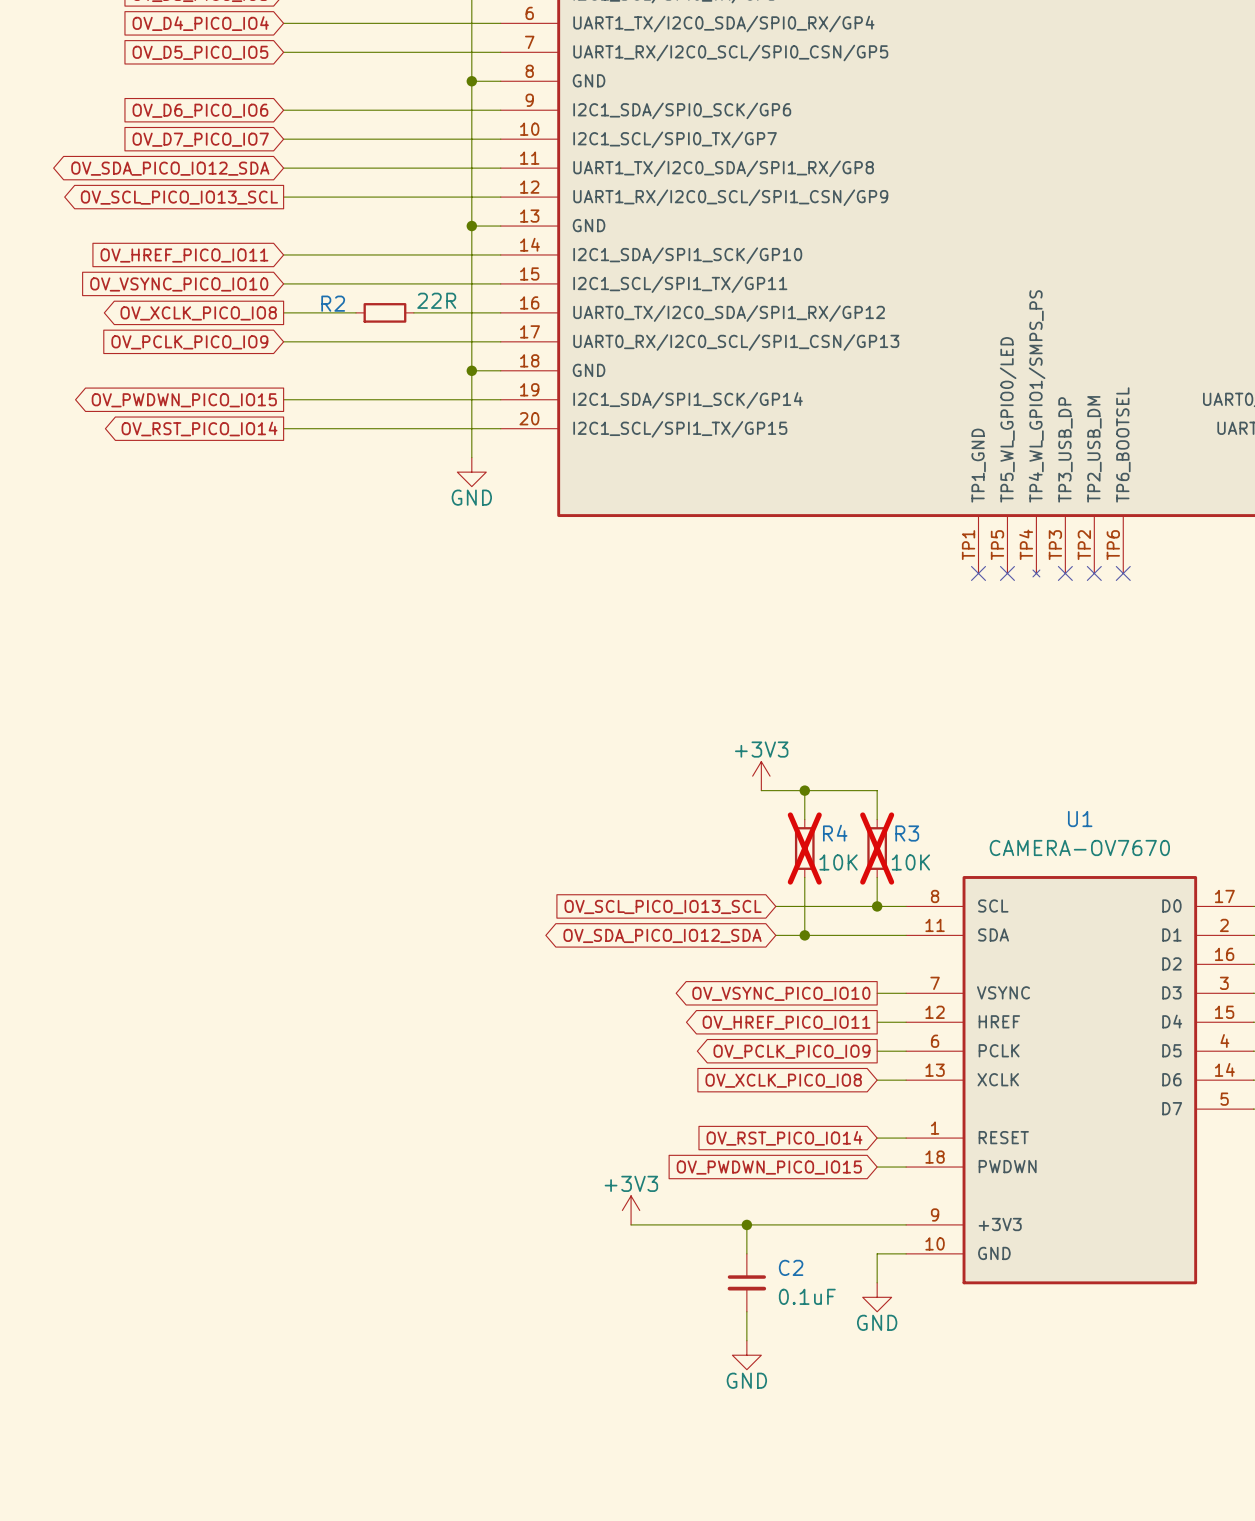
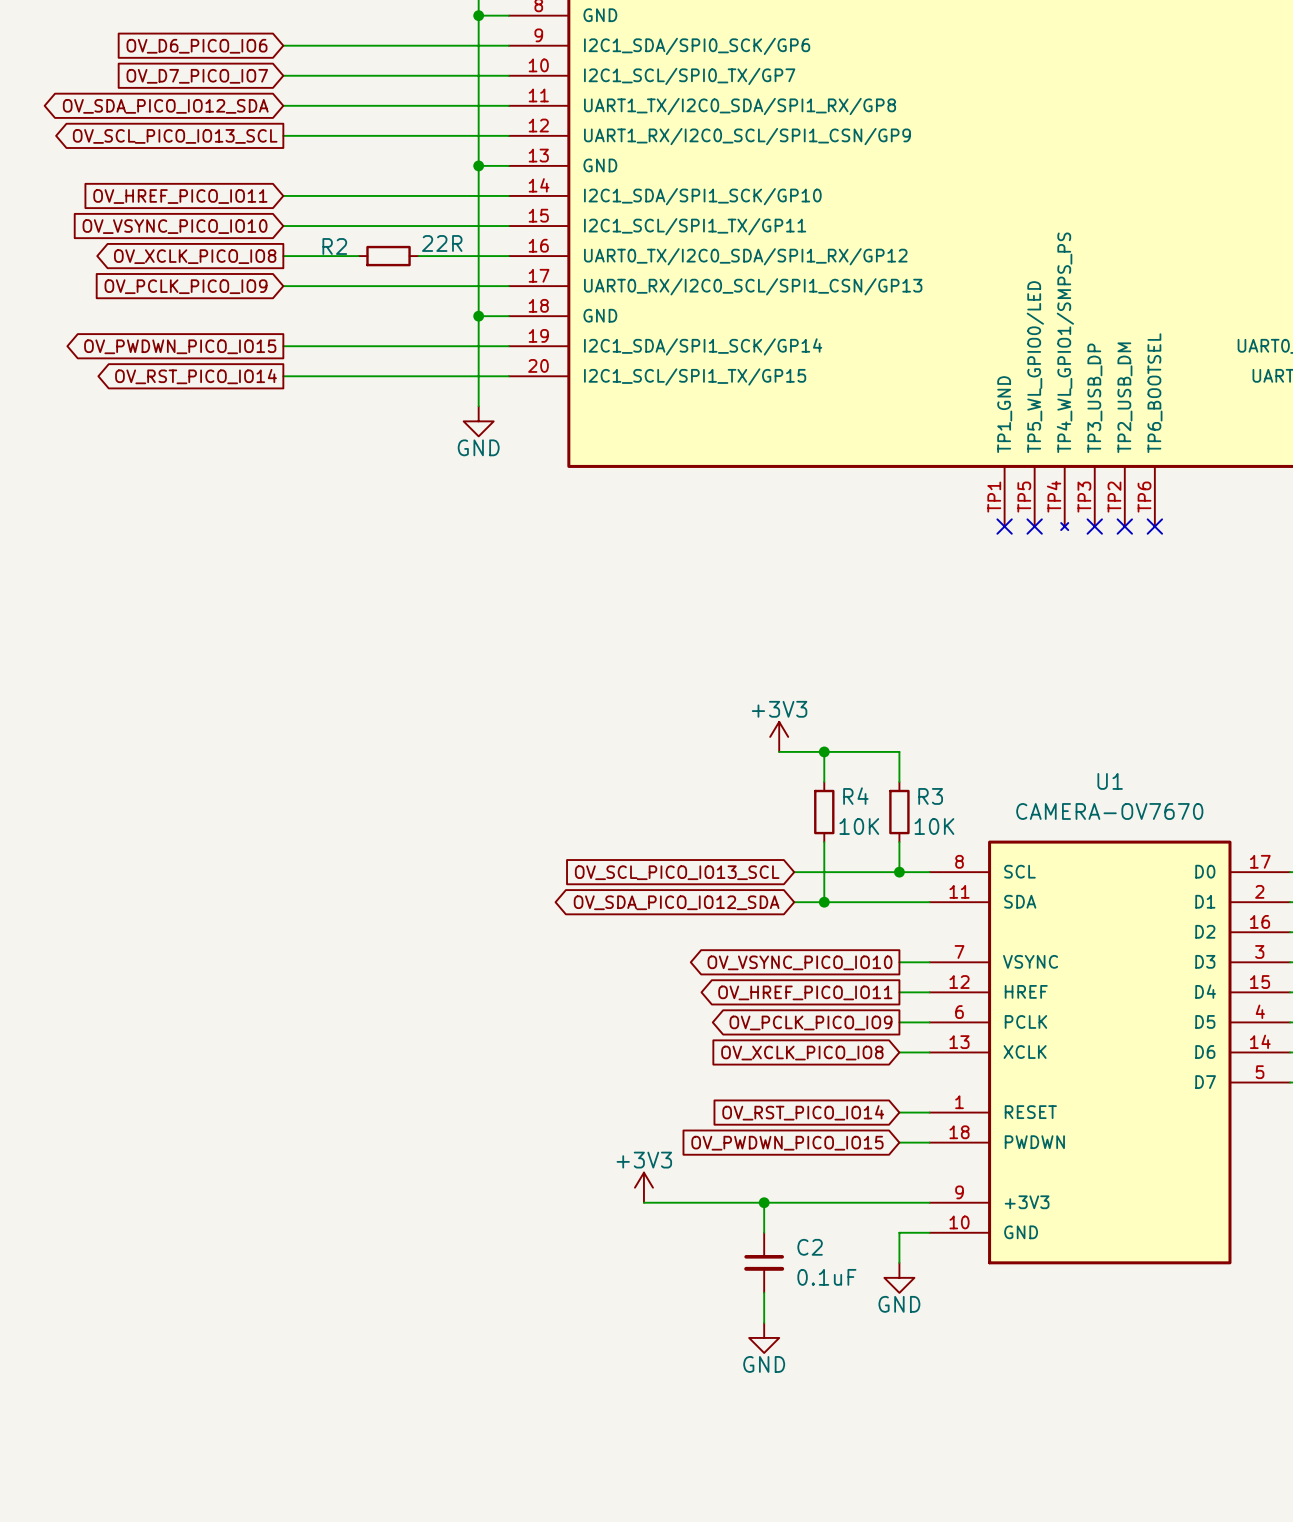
R4 do-not-place cross: (804, 848) -> none
R3 do-not-place cross: (877, 848) -> none

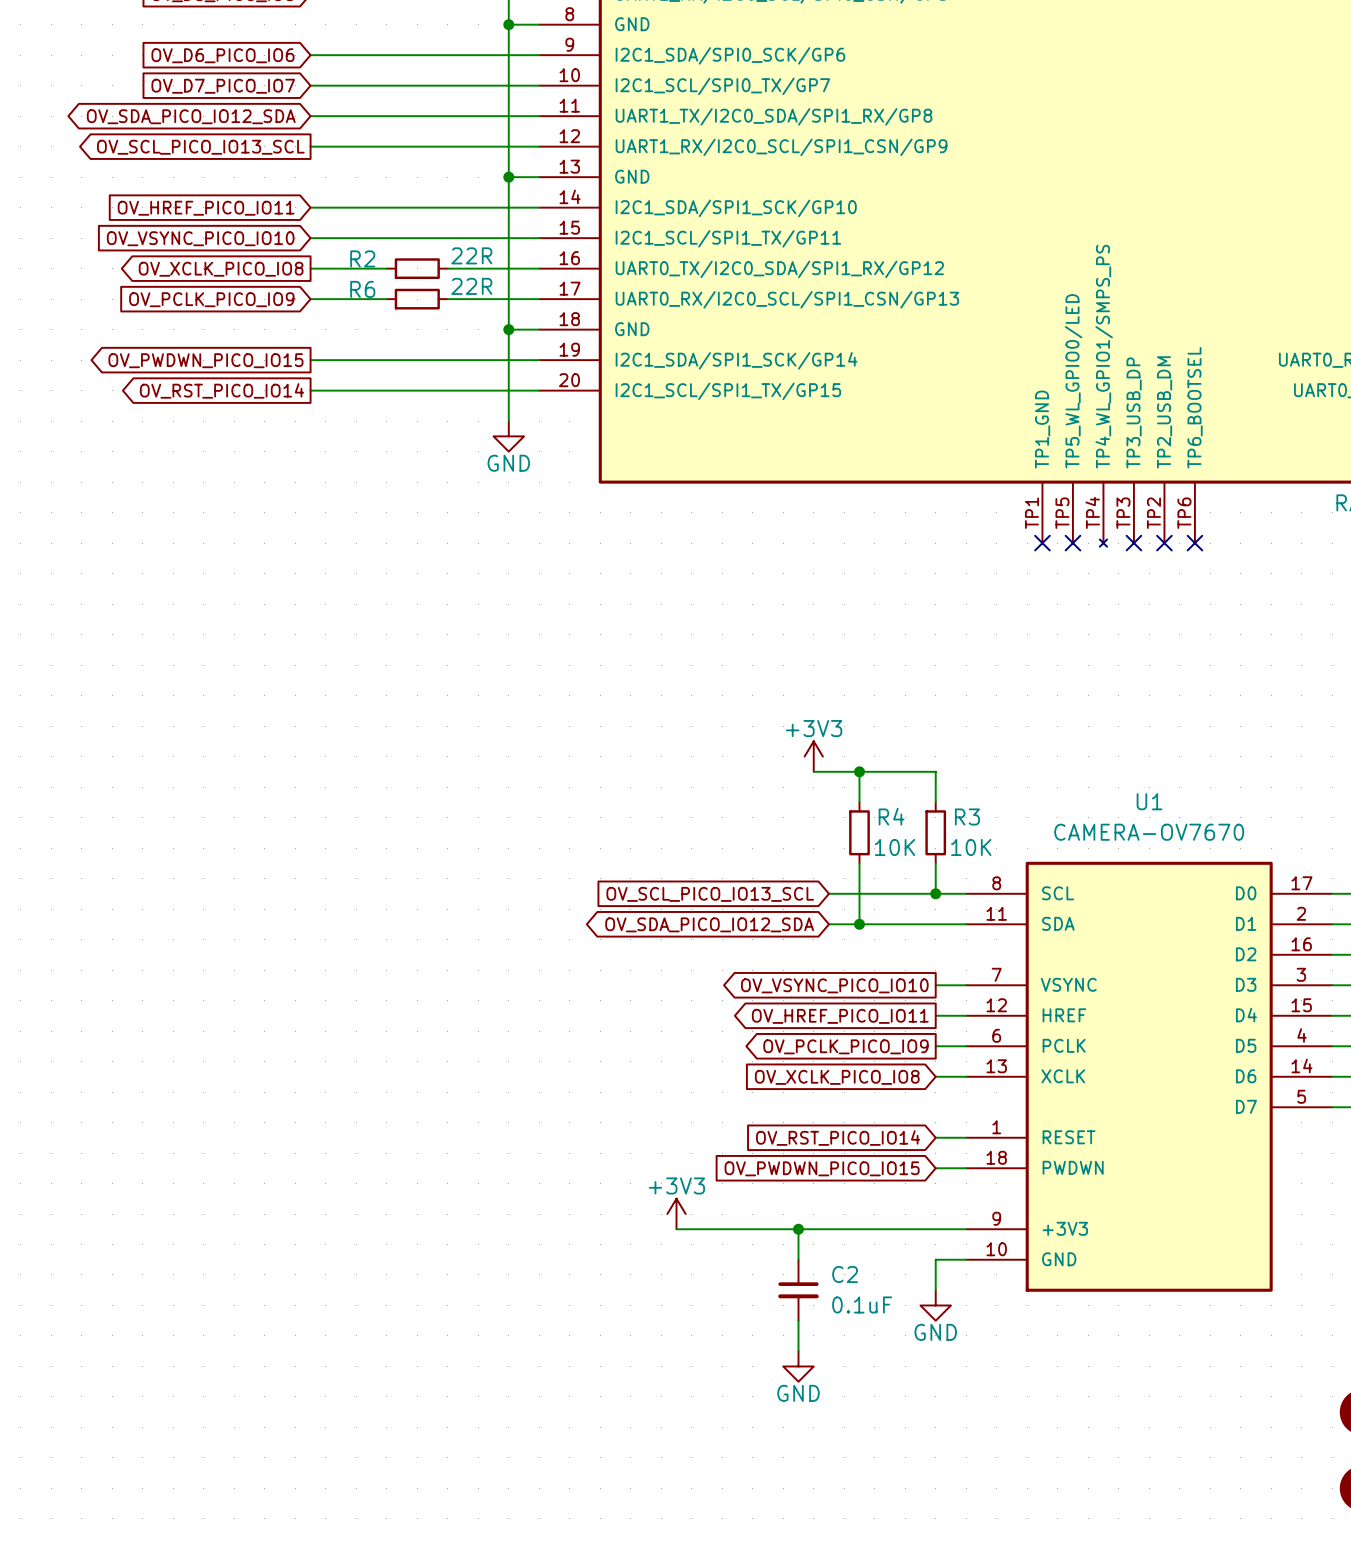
wire: (358, 286) (418, 286) -> none
R6: none -> 22R (417, 299)

